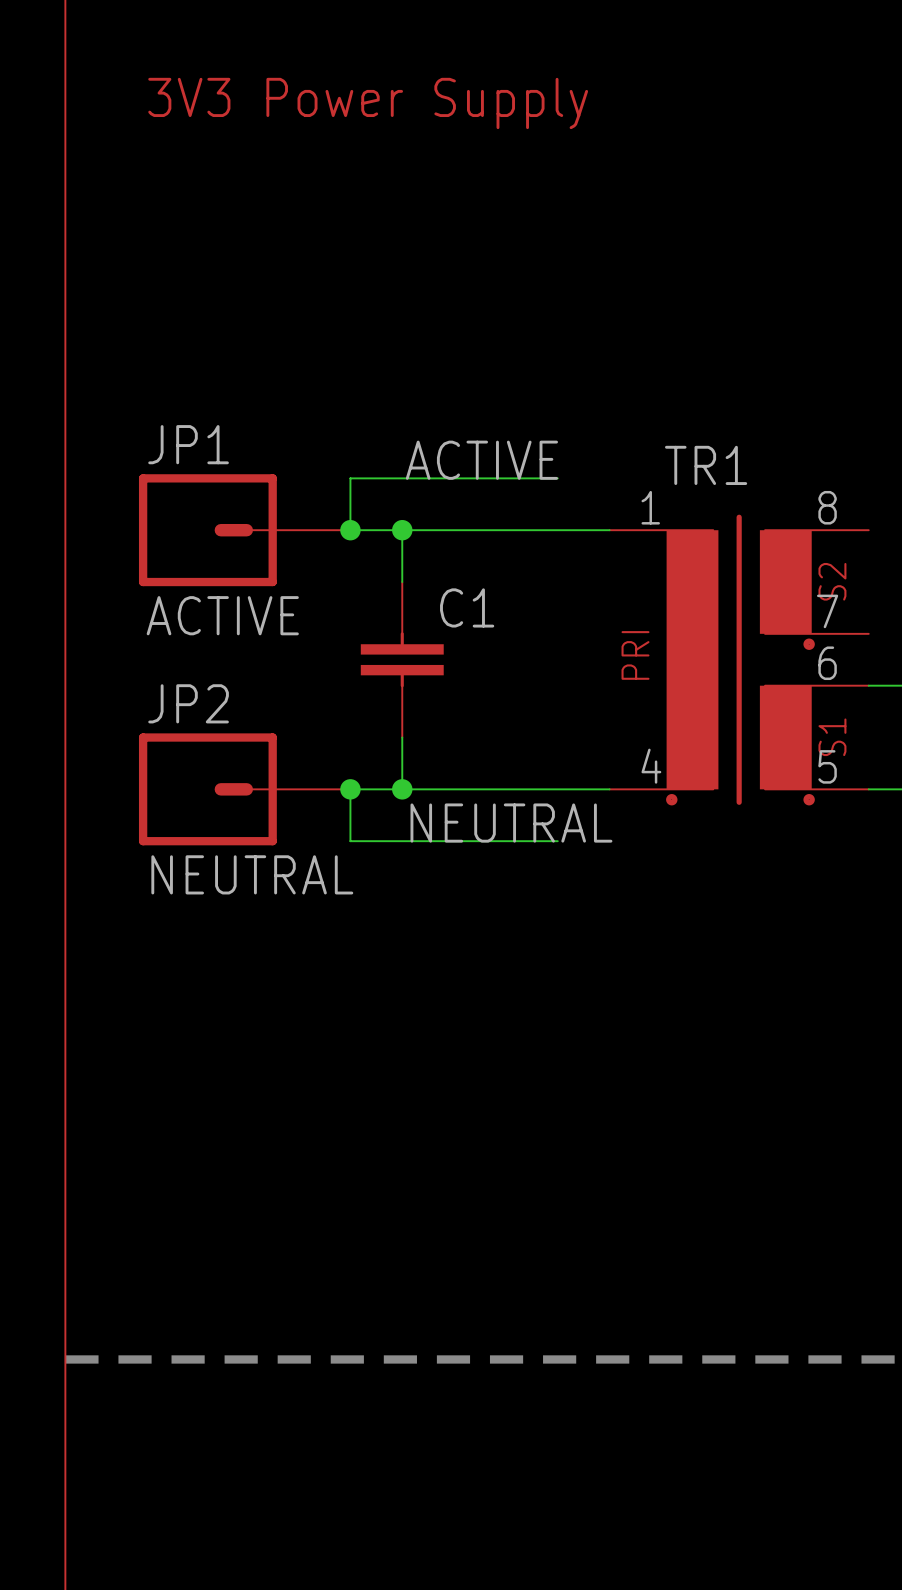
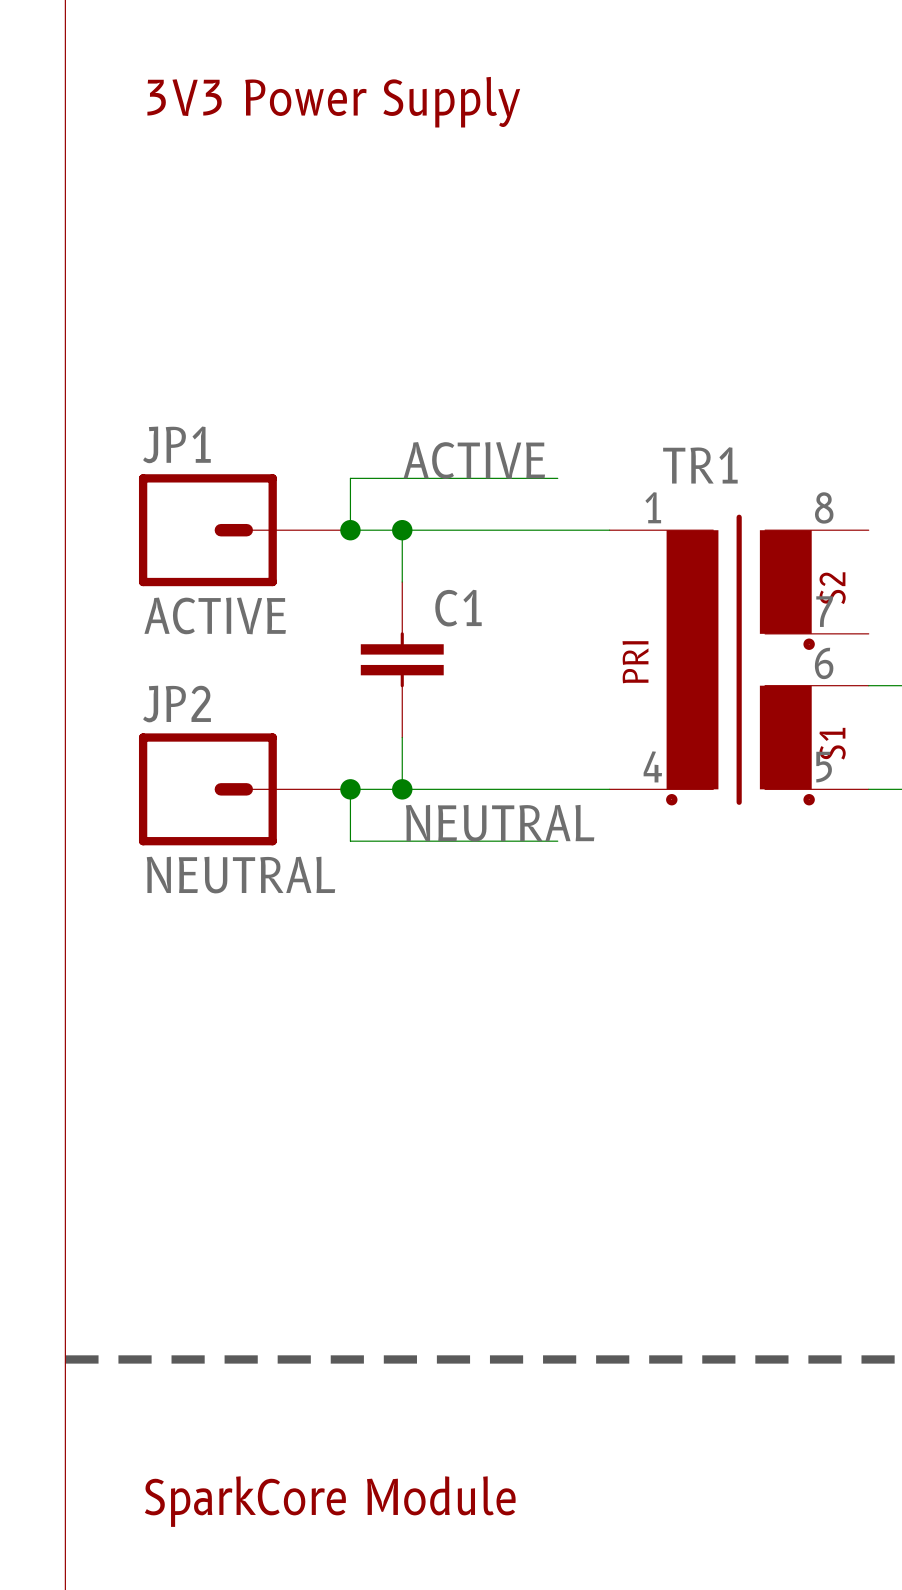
text: none -> SparkCore Module (330, 1501)

